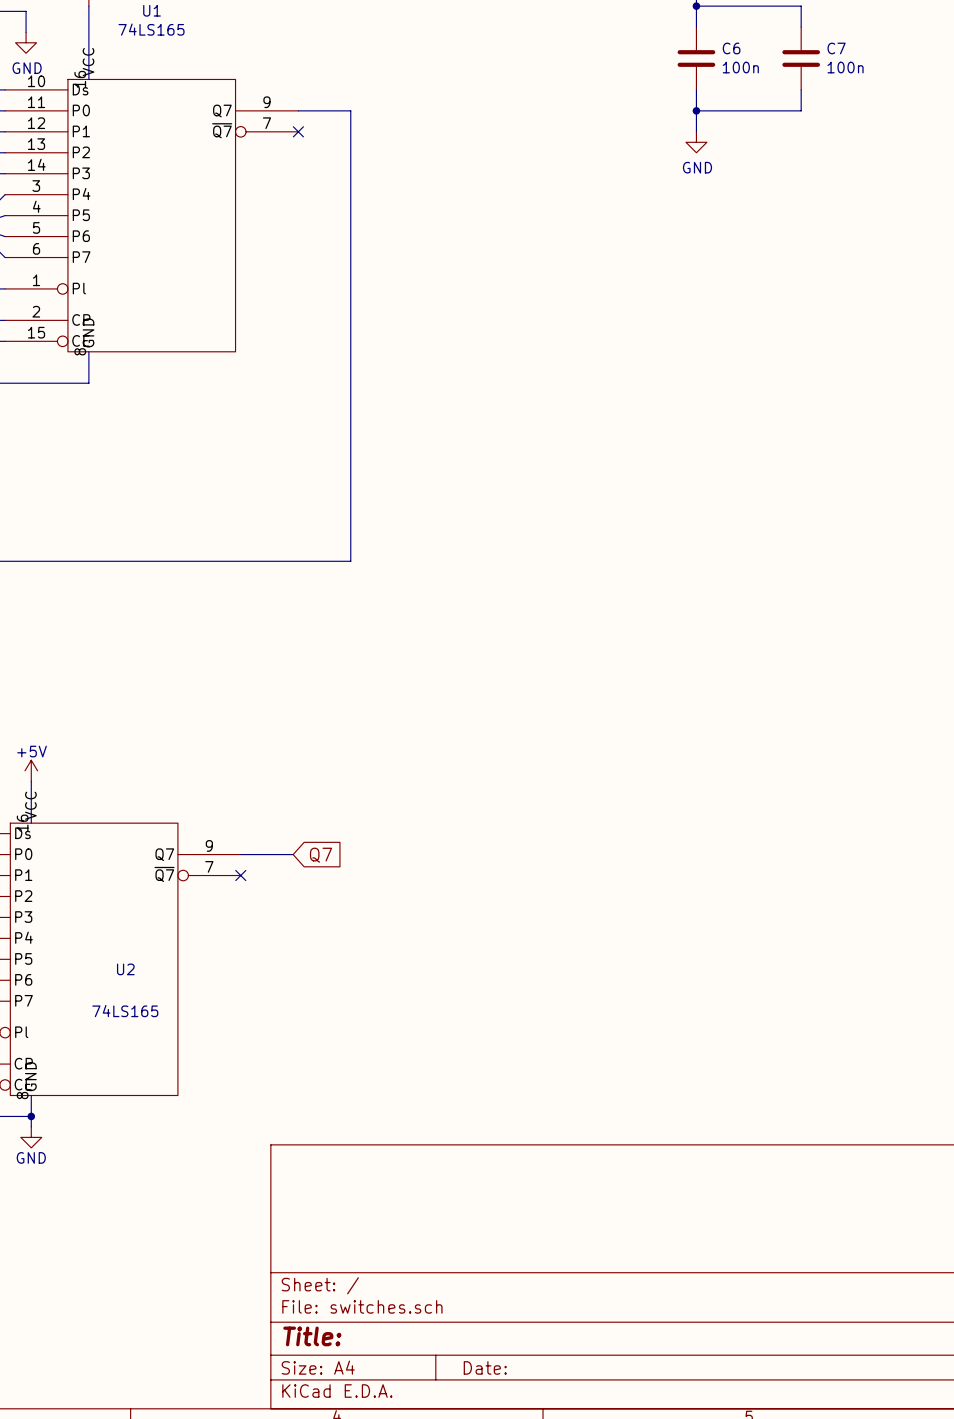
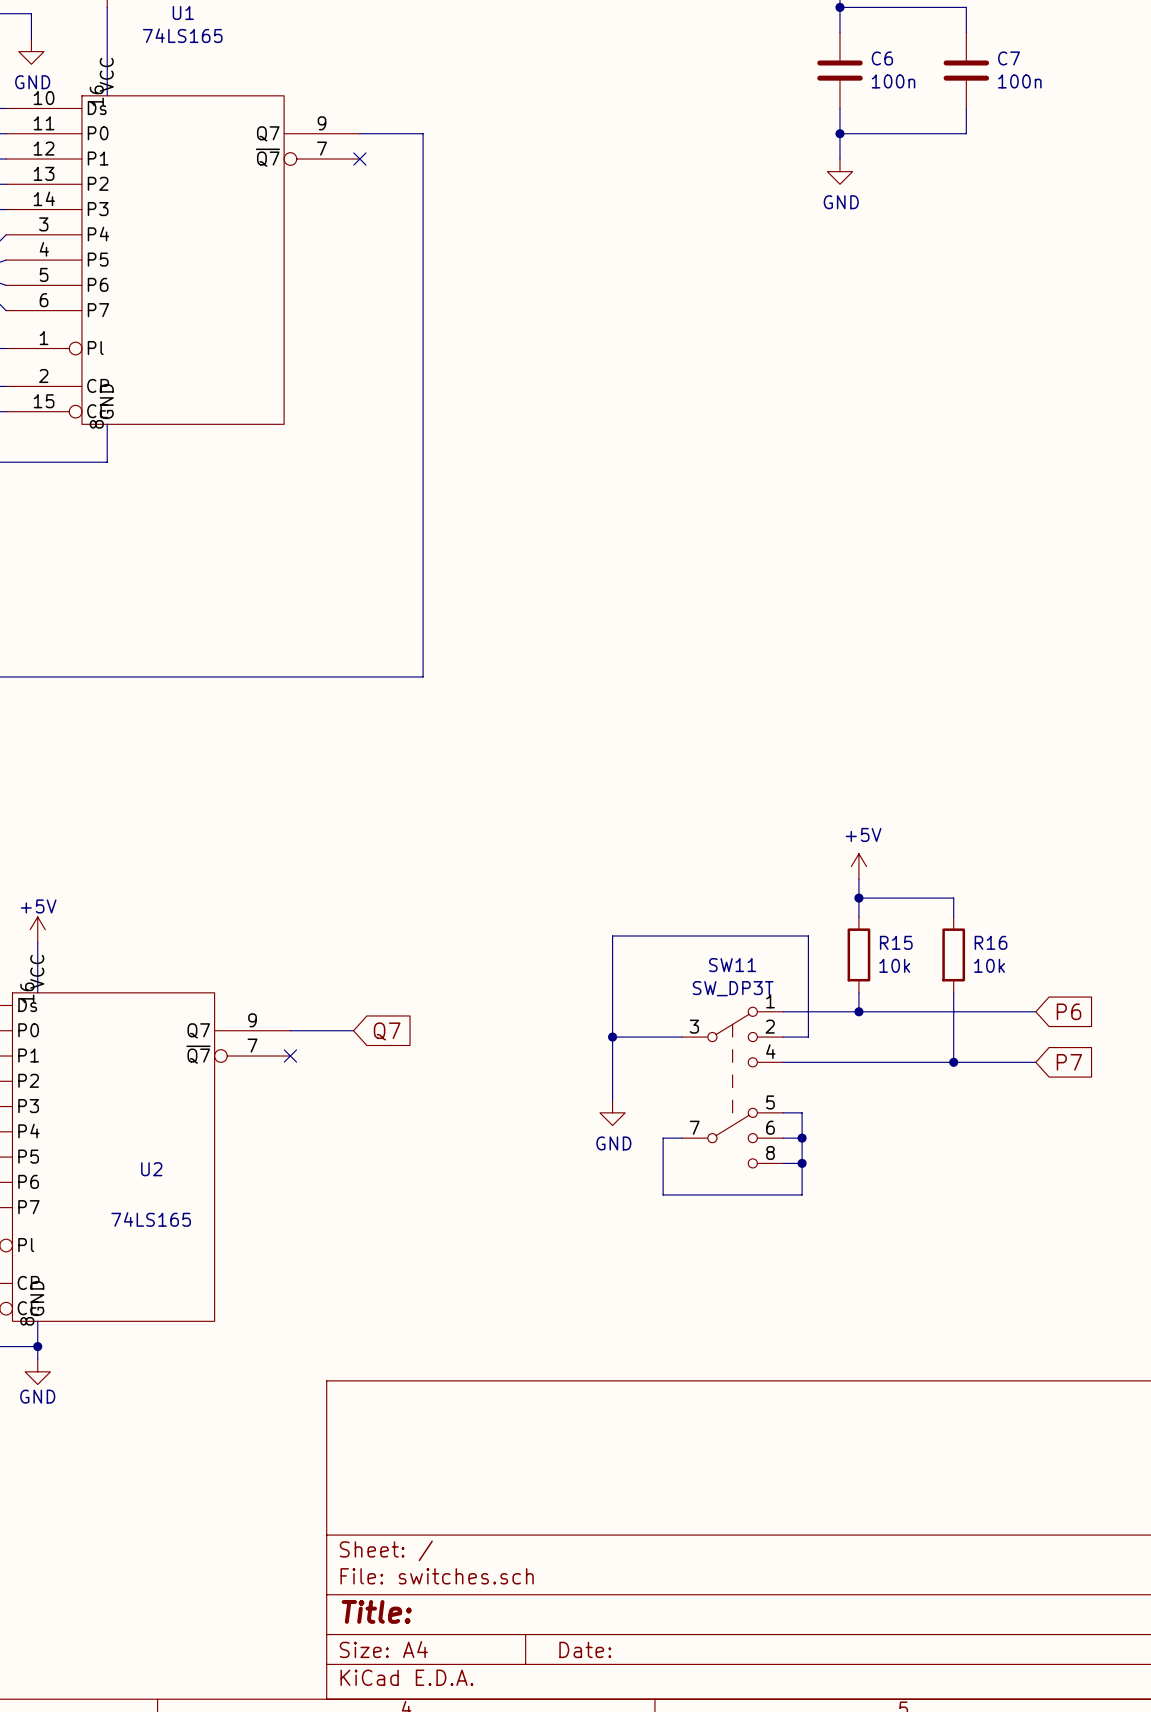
power symbol: none -> +5V (858, 866)
wire: none -> (858, 879) (858, 917)
wire: none -> (858, 898) (953, 898) (953, 917)
junction: none -> (858, 898)
R15: none -> 10k (858, 954)
R16: none -> 10k (953, 954)
wire: none -> (858, 992) (858, 1011)
wire: none -> (953, 992) (953, 1062)
wire: none -> (783, 1011) (1035, 1011)
junction: none -> (858, 1011)
global label: none -> P6 (1069, 1011)
wire: none -> (612, 1037) (682, 1037)
junction: none -> (612, 1037)
wire: none -> (783, 1037) (808, 1037) (808, 935) (612, 935) (612, 1100)
wire: none -> (783, 1062) (1035, 1062)
junction: none -> (953, 1062)
global label: none -> P7 (1069, 1062)
SW11: none -> SW_DP3T (732, 1087)
power symbol: none -> GND (612, 1112)
wire: none -> (783, 1112) (802, 1112) (802, 1194) (663, 1194) (663, 1138) (682, 1138)
wire: none -> (783, 1138) (802, 1138)
junction: none -> (802, 1138)
wire: none -> (783, 1163) (802, 1163)
junction: none -> (802, 1163)

